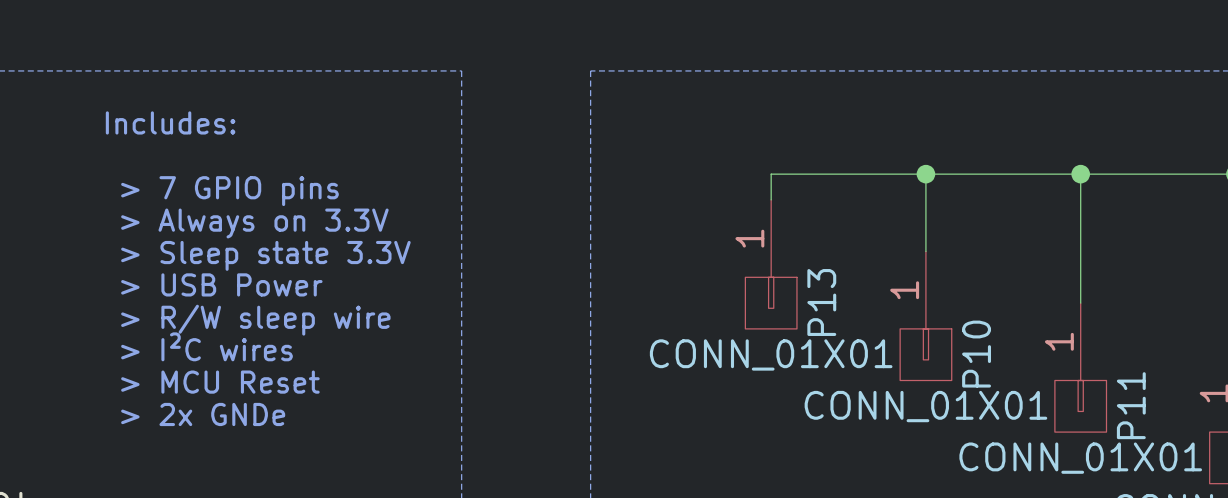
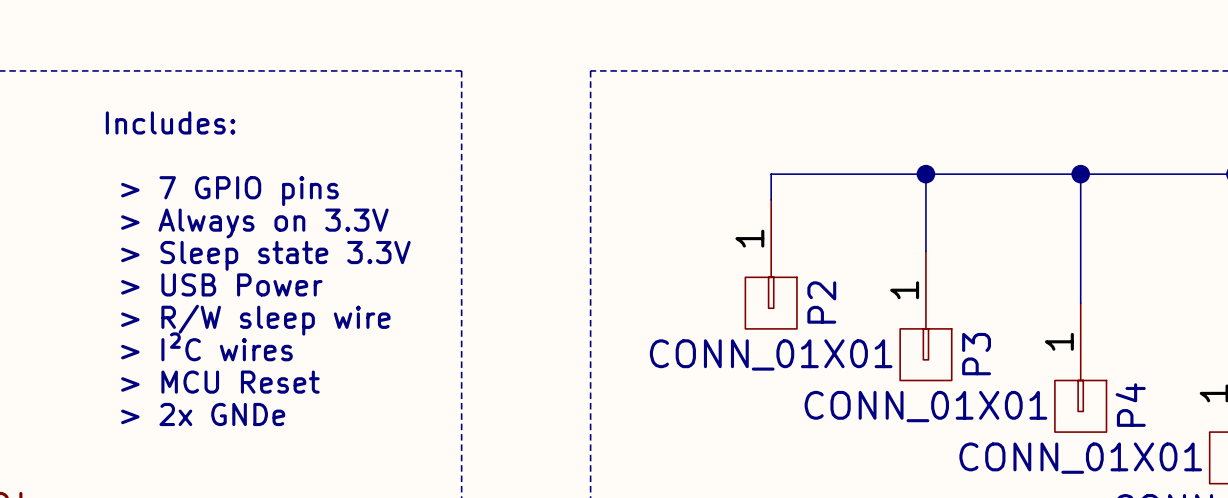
P13 name: P13 (821, 302) -> P2 (821, 302)
P10 name: P10 (976, 354) -> P3 (976, 354)
P11 name: P11 (1131, 405) -> P4 (1130, 405)

